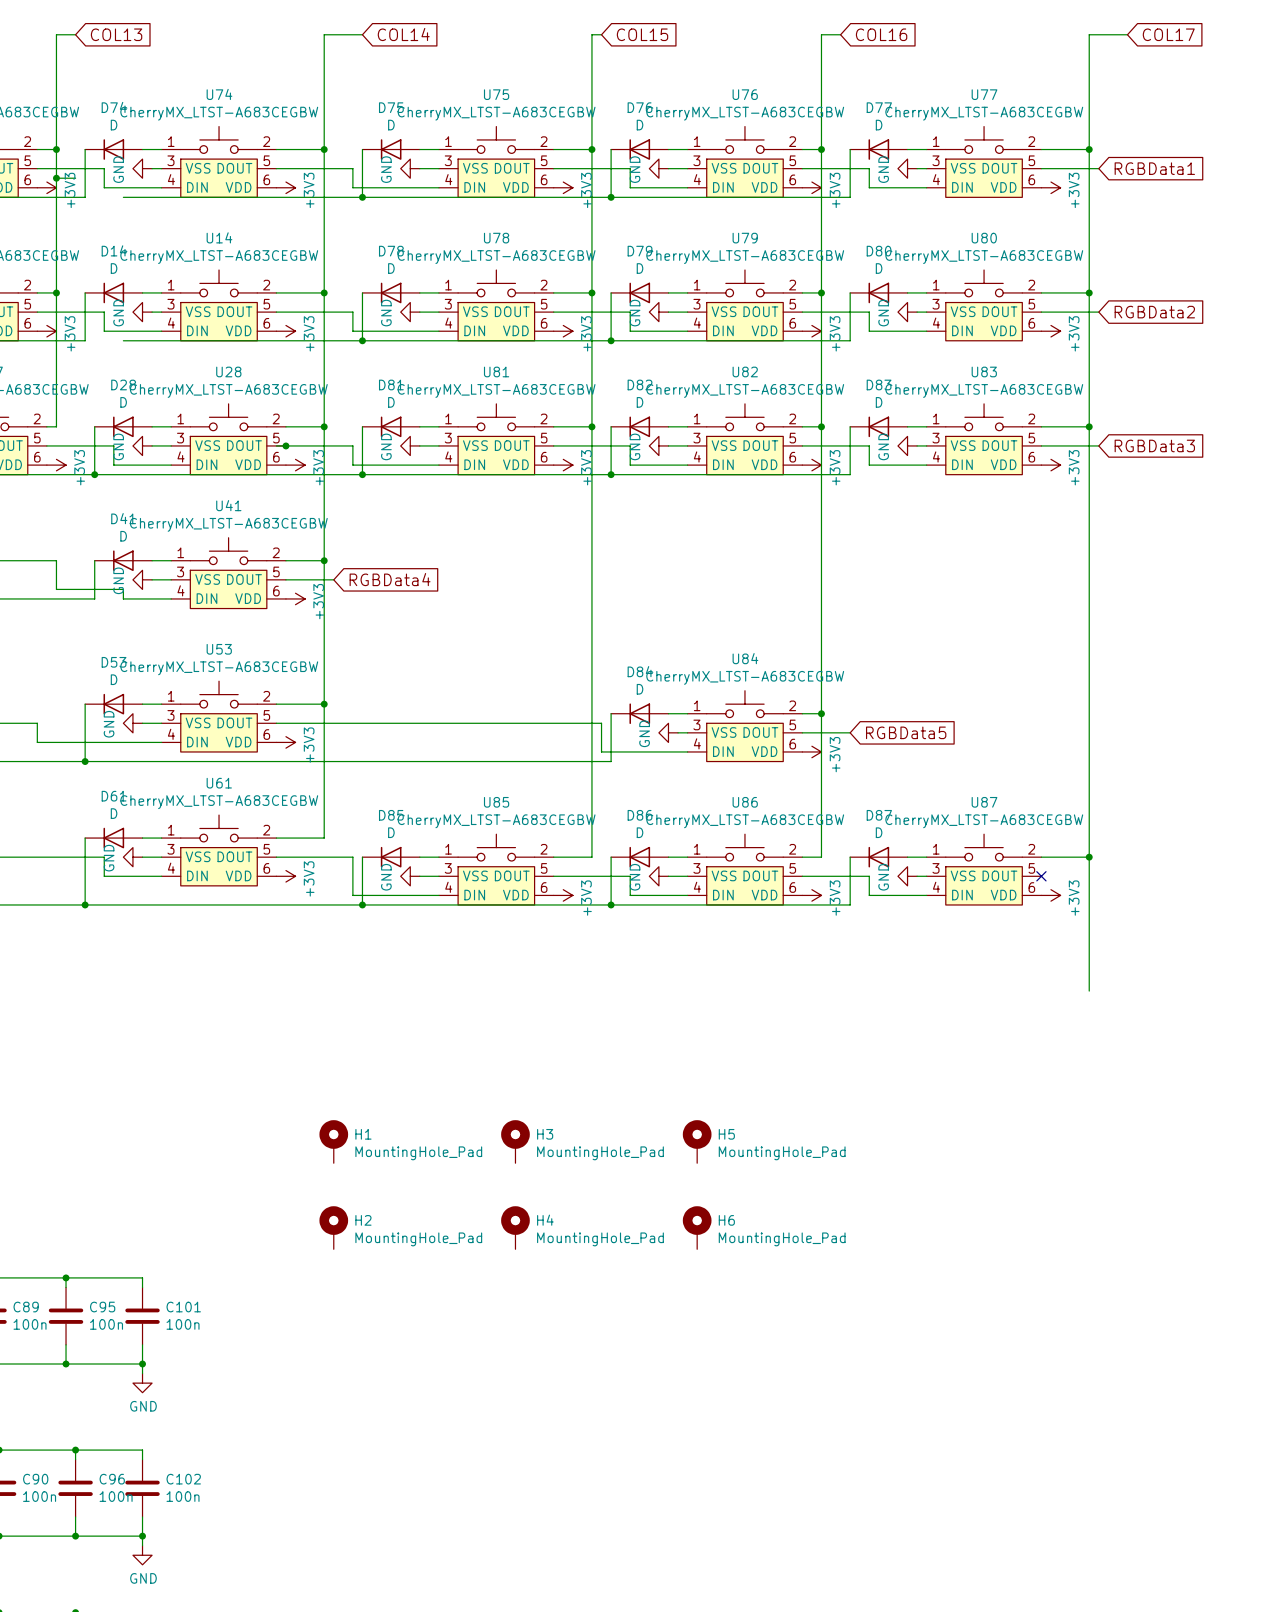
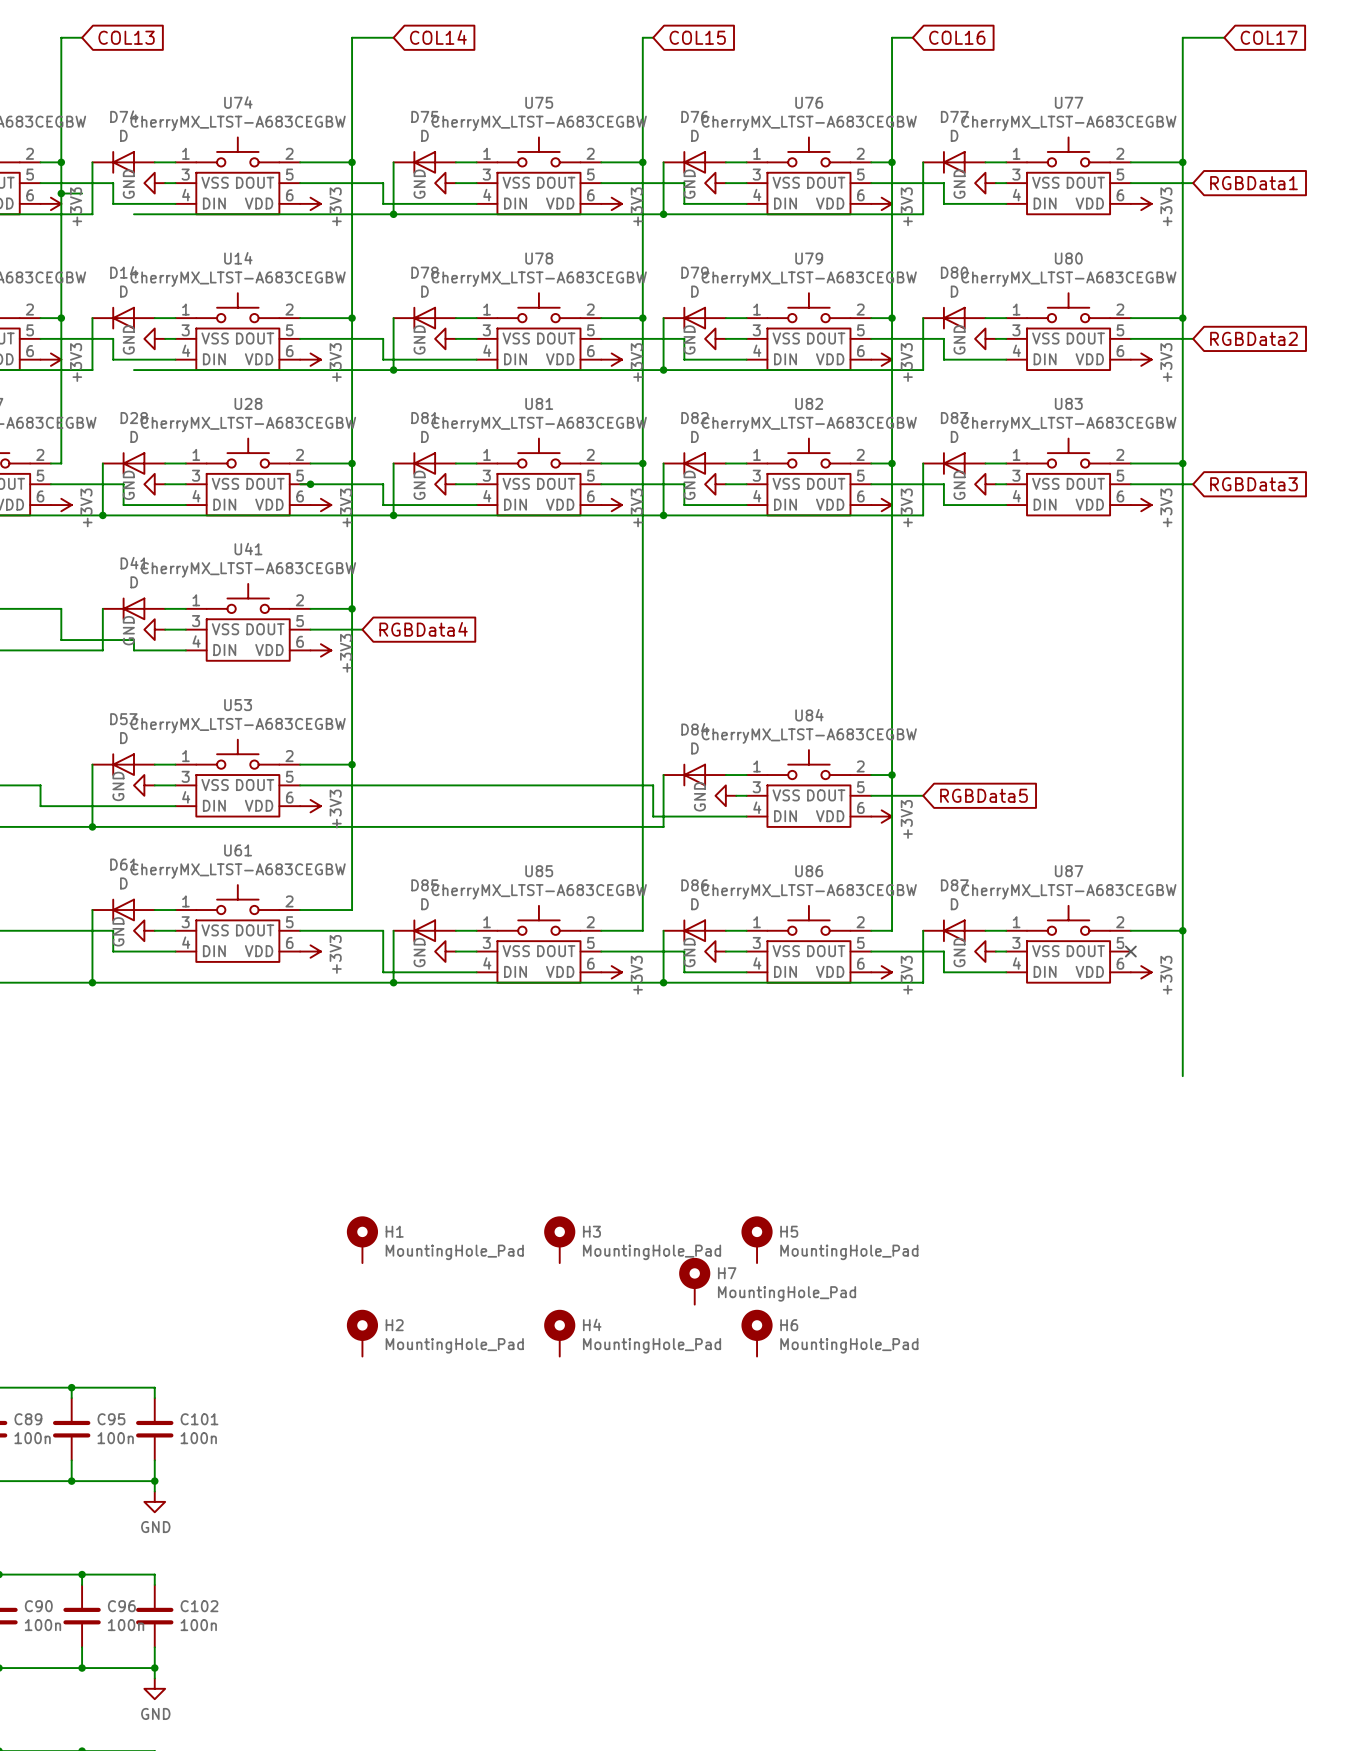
H7: none -> MountingHole_Pad (694, 1281)

